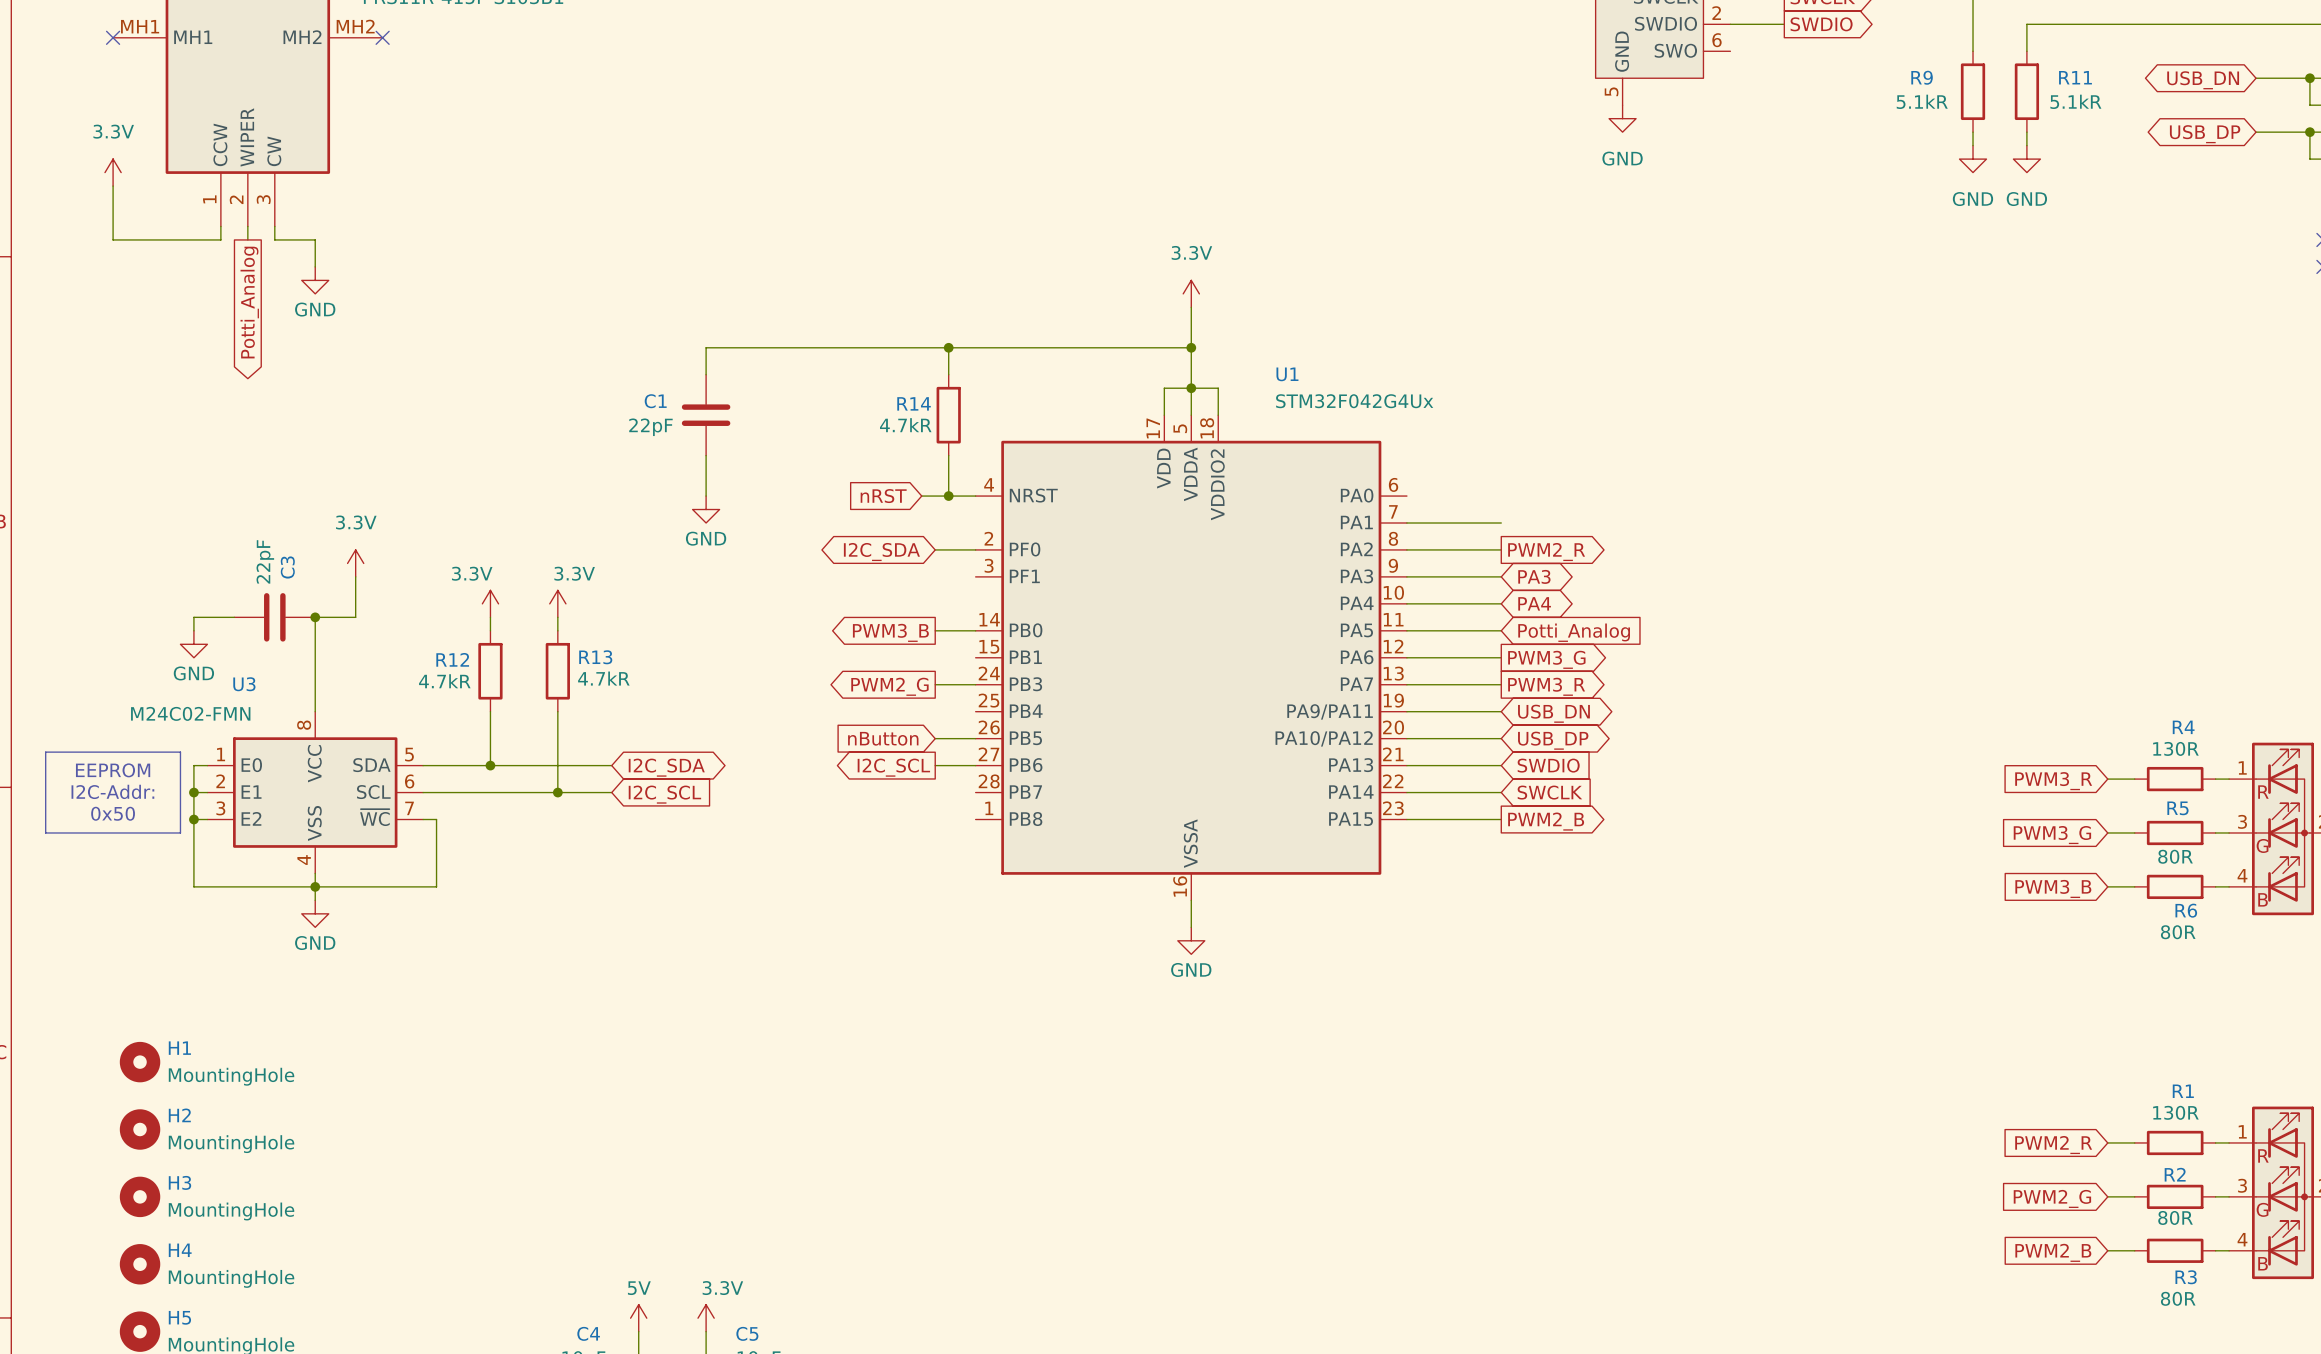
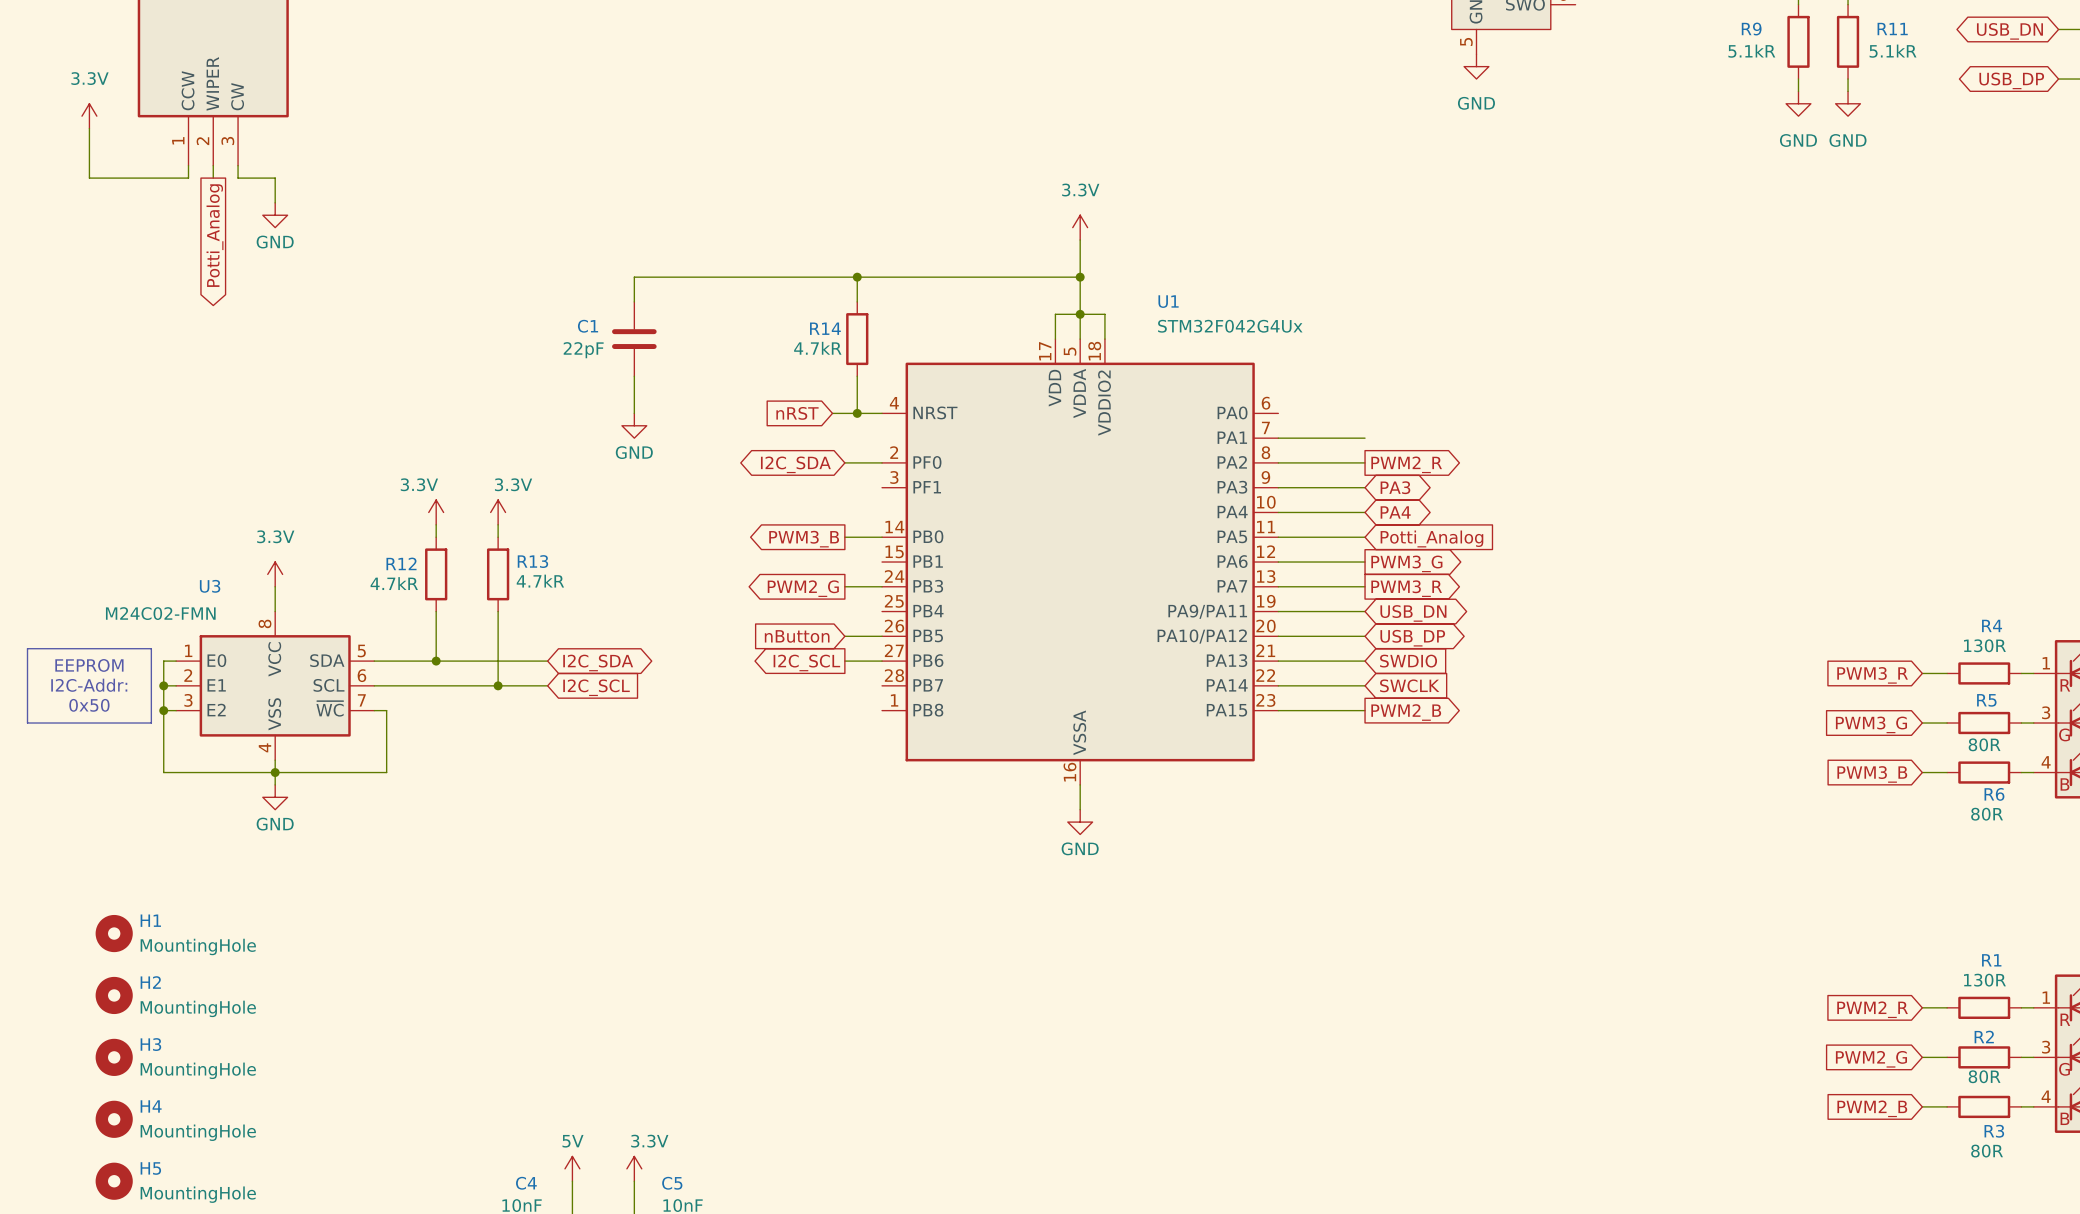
power symbol position: 3.3V (355, 563) -> 3.3V (275, 574)
wire: (355, 576) (355, 617) (315, 617) (315, 684) -> none
wire: (234, 617) (193, 617) (193, 630) -> none
C3: 22pF (274, 617) -> none
junction: (315, 617) -> none
power symbol: GND (193, 644) -> none

